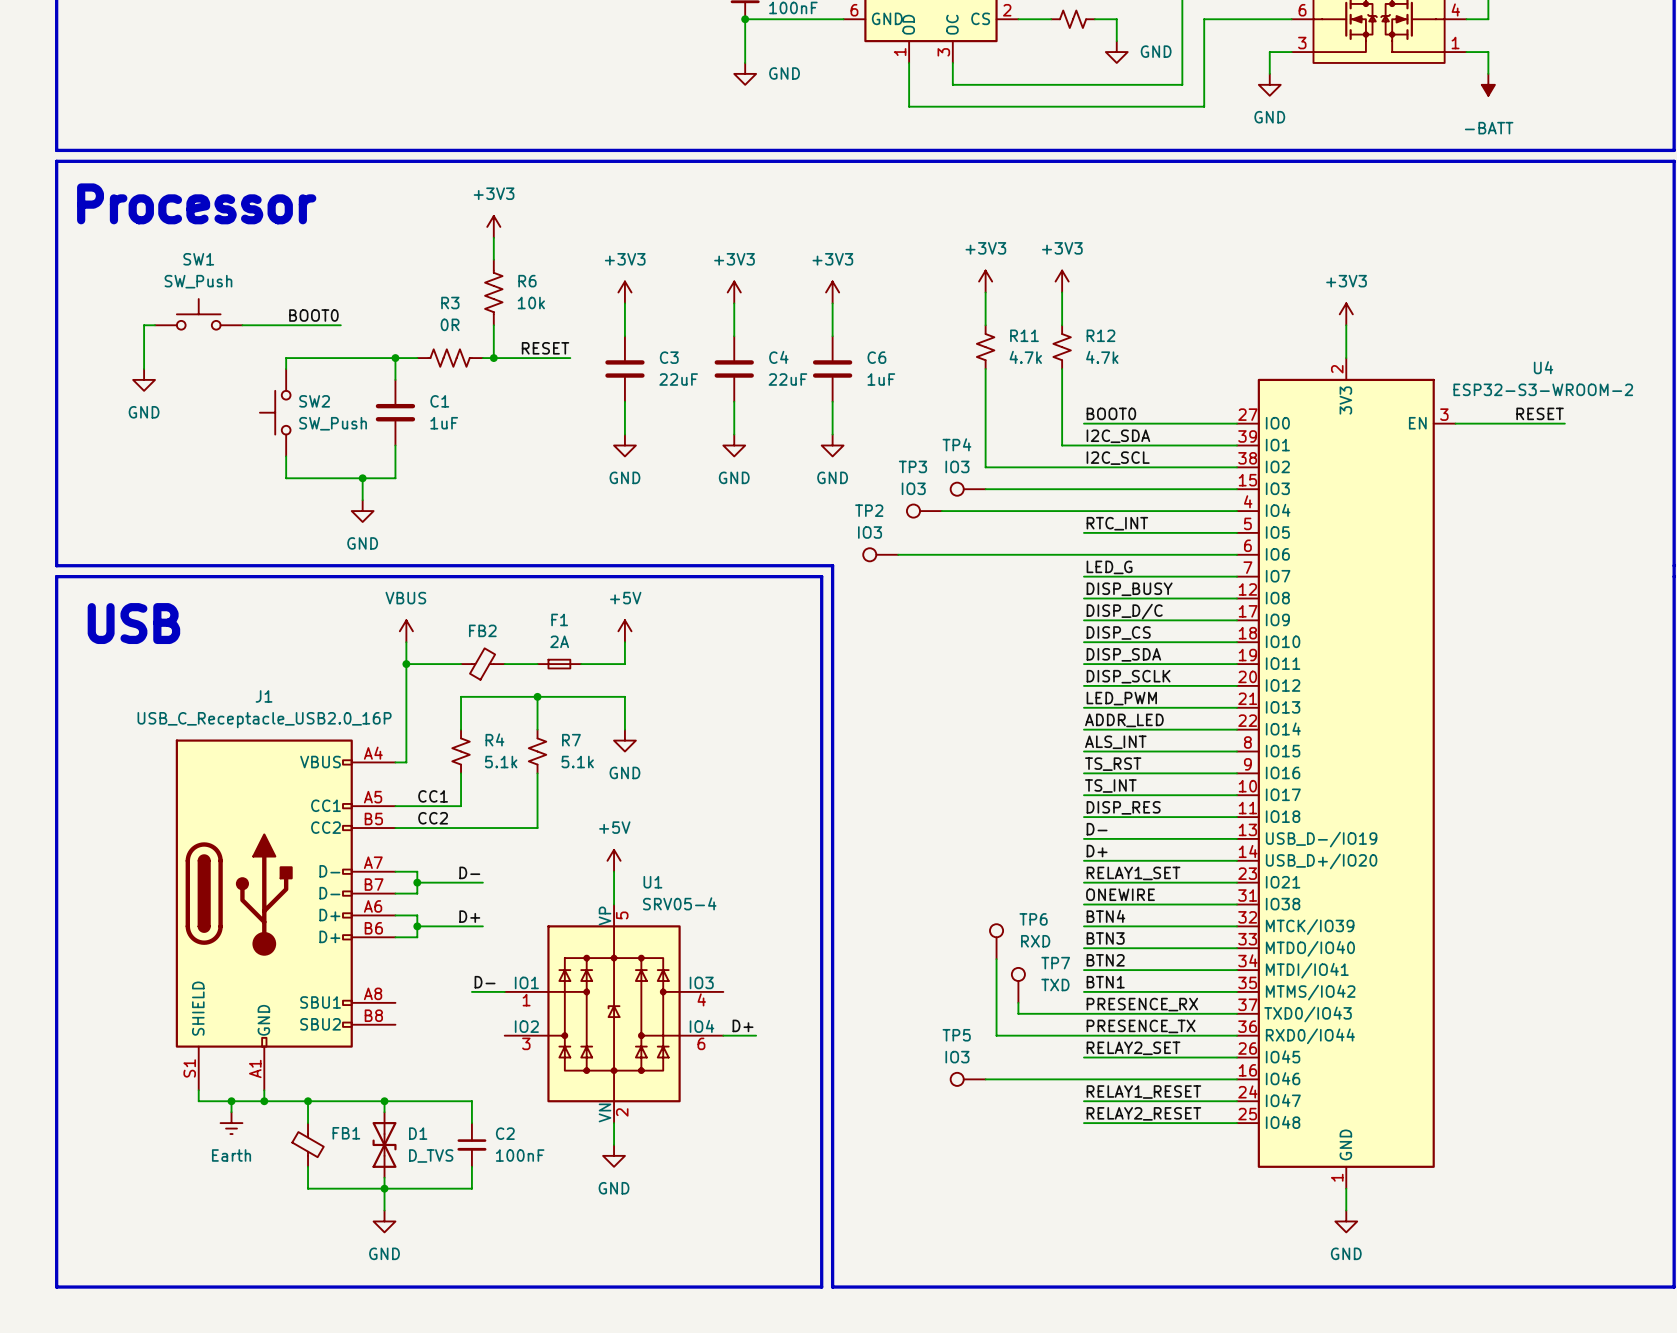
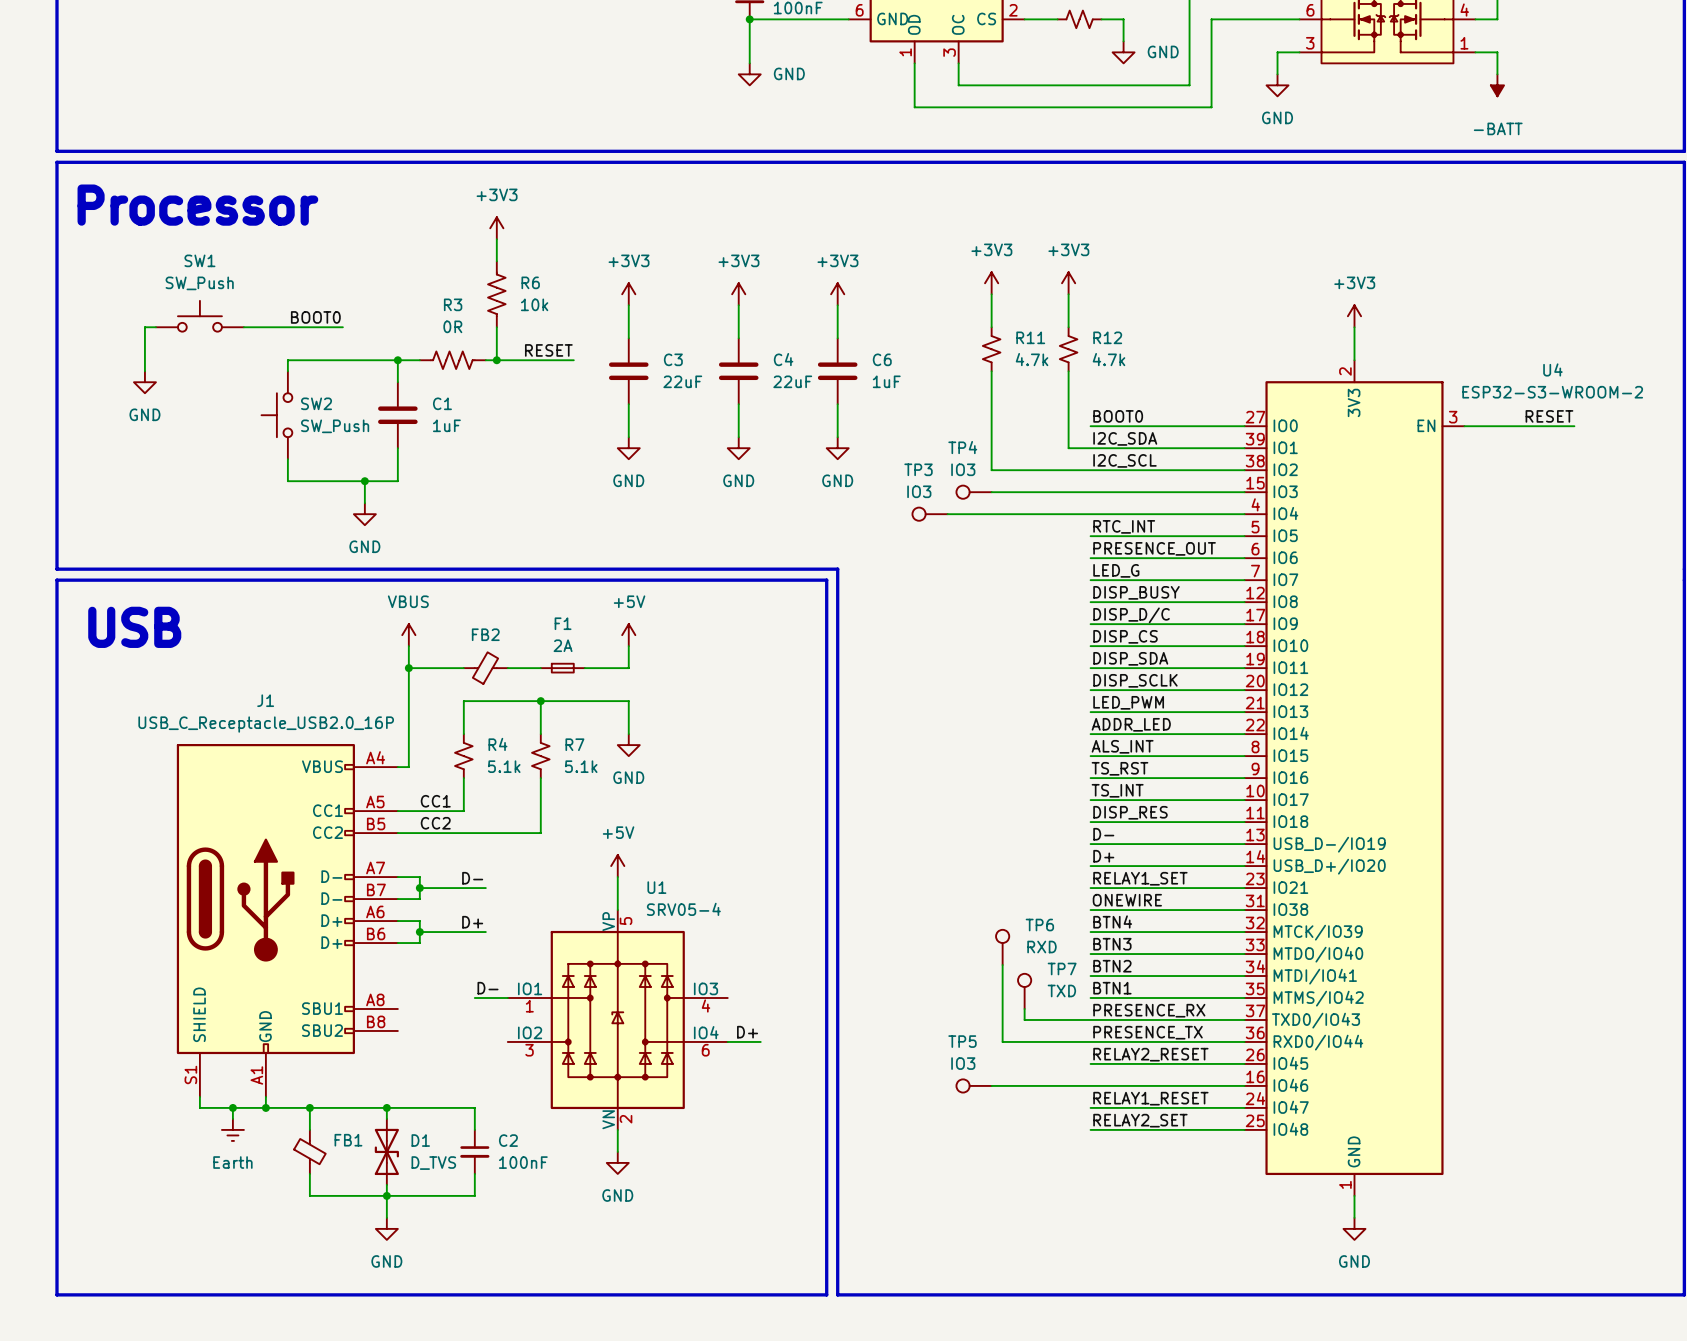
label: none -> PRESENCE_OUT (1154, 548)
TP2: IO3 (880, 554) -> none
wire: (898, 554) (1083, 554) -> none
label: RELAY2_SET (1133, 1048) -> RELAY2_RESET (1150, 1054)
label: RELAY2_RESET (1143, 1113) -> RELAY2_SET (1140, 1120)

